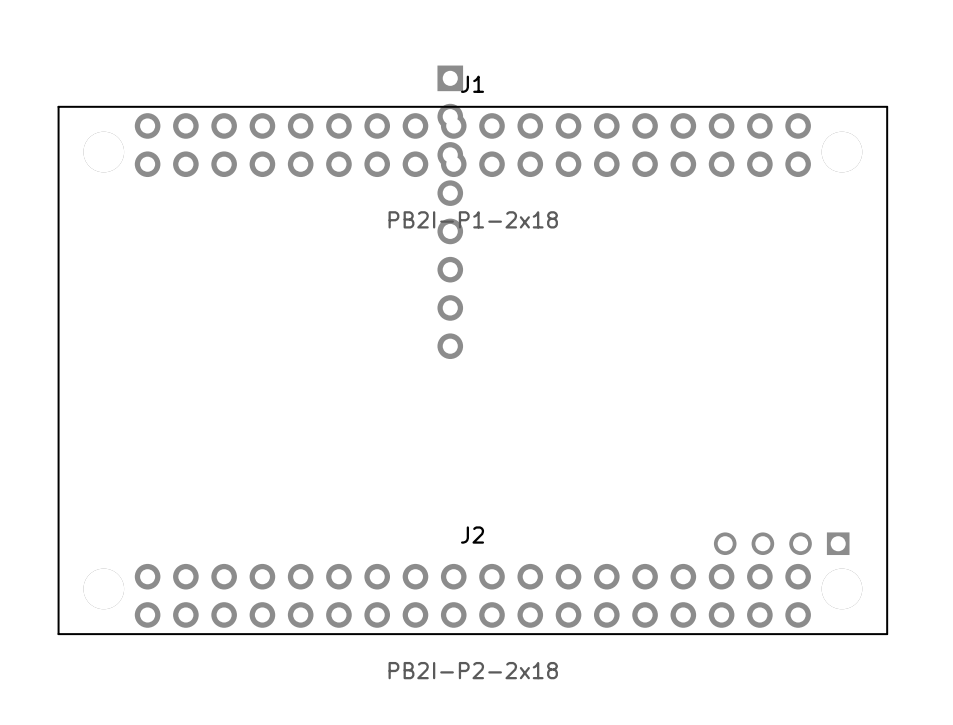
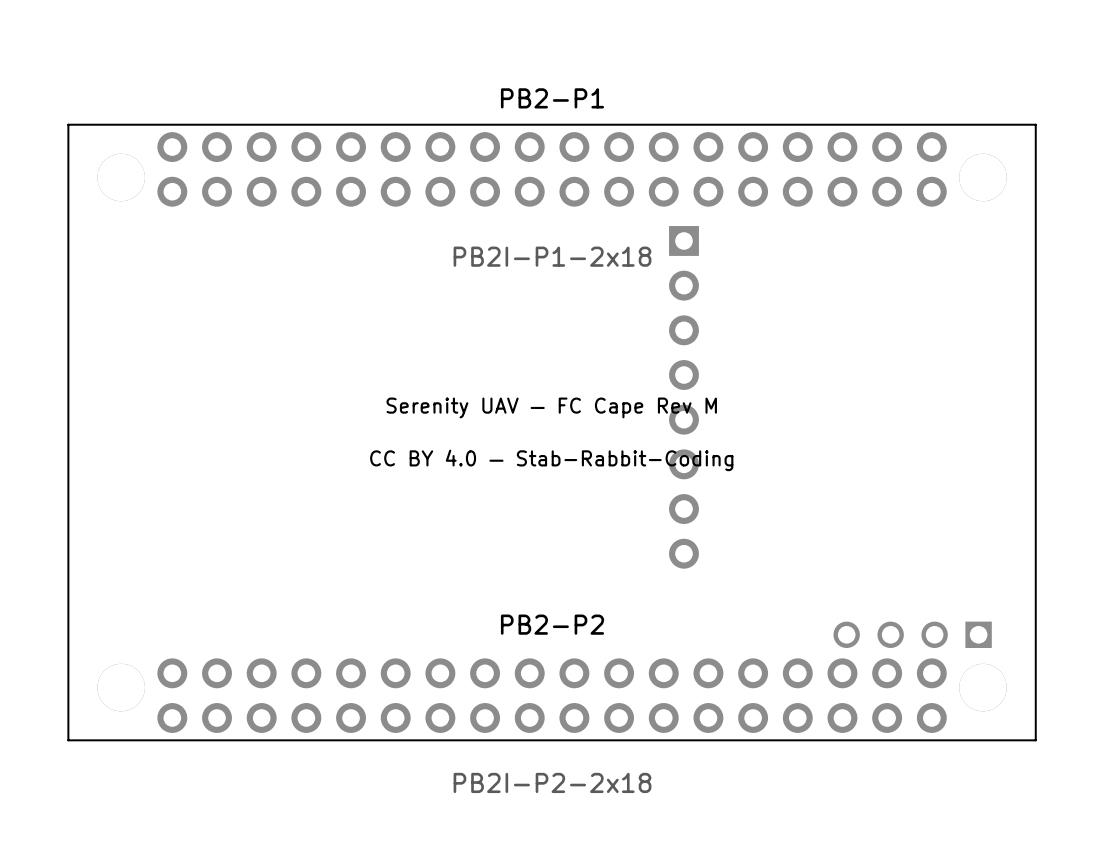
J1 name: J1 (472, 84) -> PB2-P1 (552, 98)
part position: (450, 212) -> (683, 397)
text: none -> Serenity UAV — FC Cape Rev M (551, 407)
text: none -> CC BY 4.0 — Stab-Rabbit-Coding (551, 460)
J2 name: J2 (472, 535) -> PB2-P2 (552, 624)

